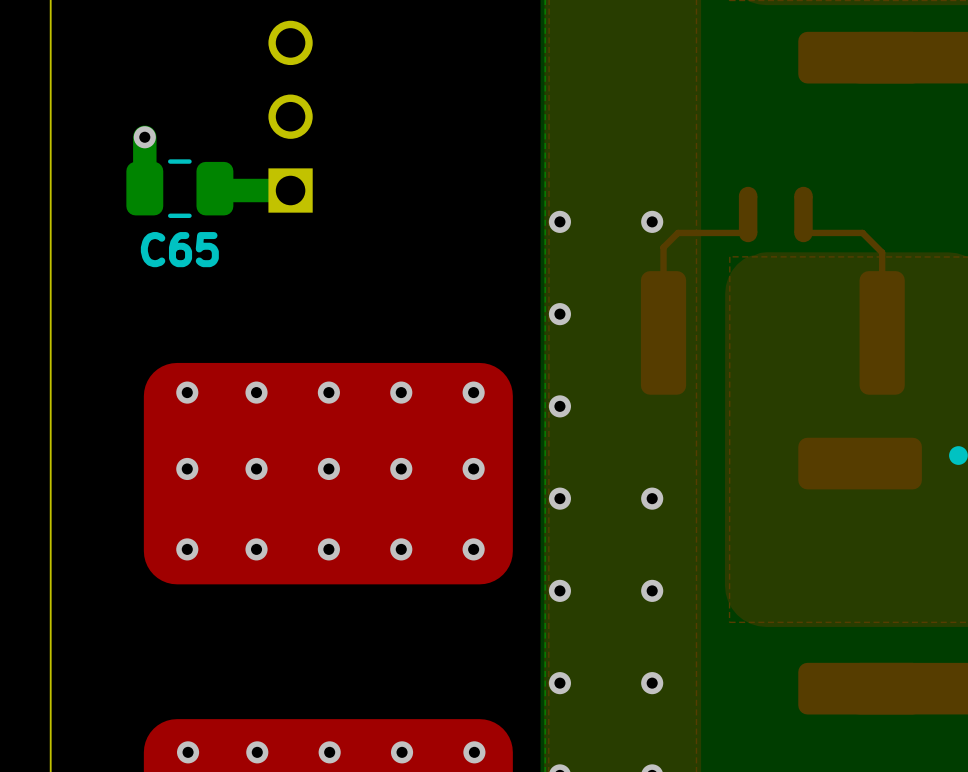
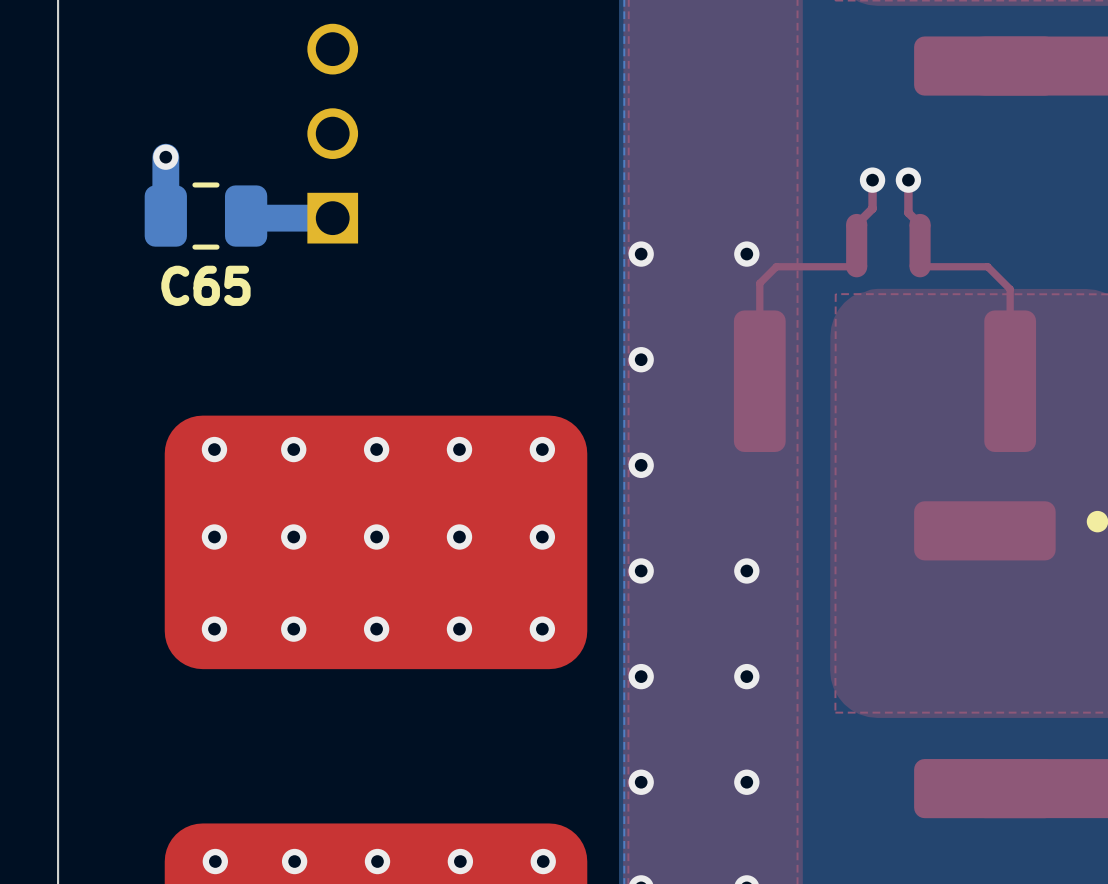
top track: none -> (872, 180) (872, 208) (856, 224)
via: none -> (872, 180)
top track: none -> (908, 180) (908, 212) (920, 224)
via: none -> (908, 180)

